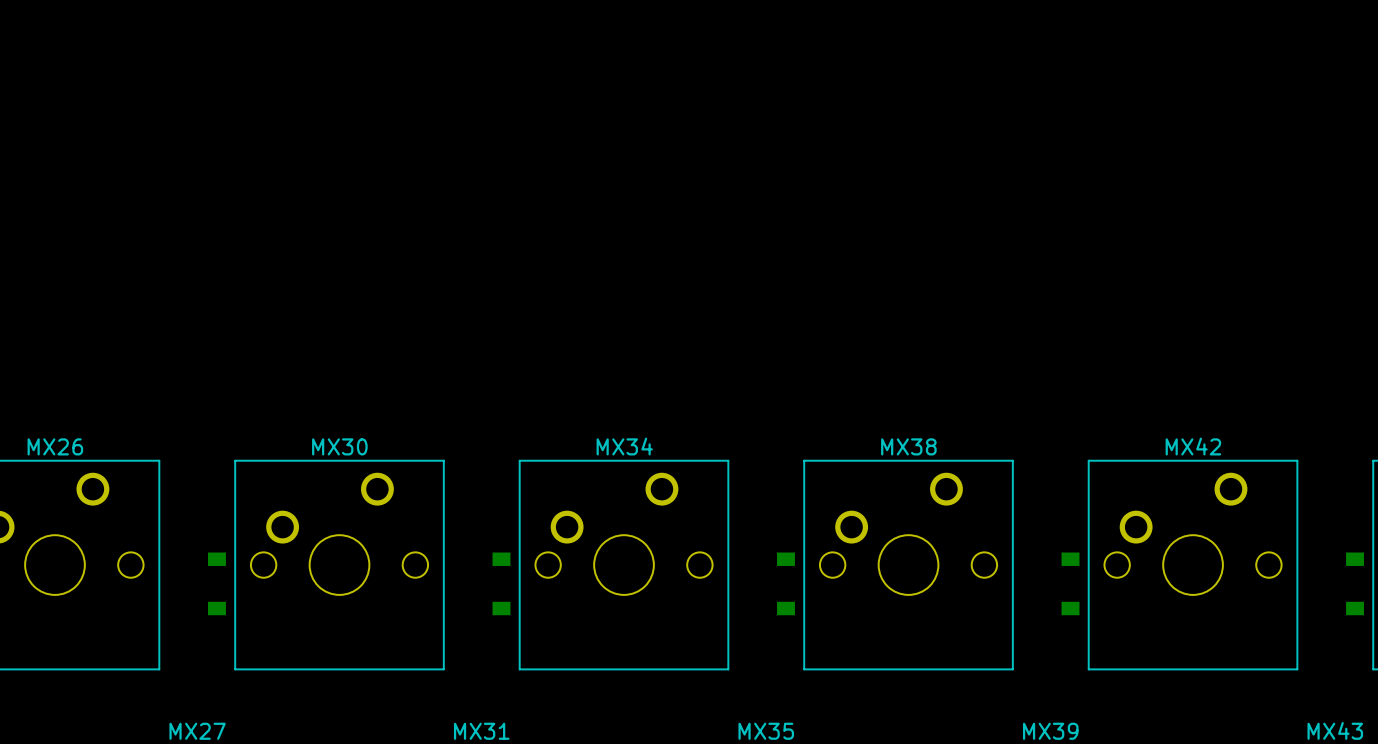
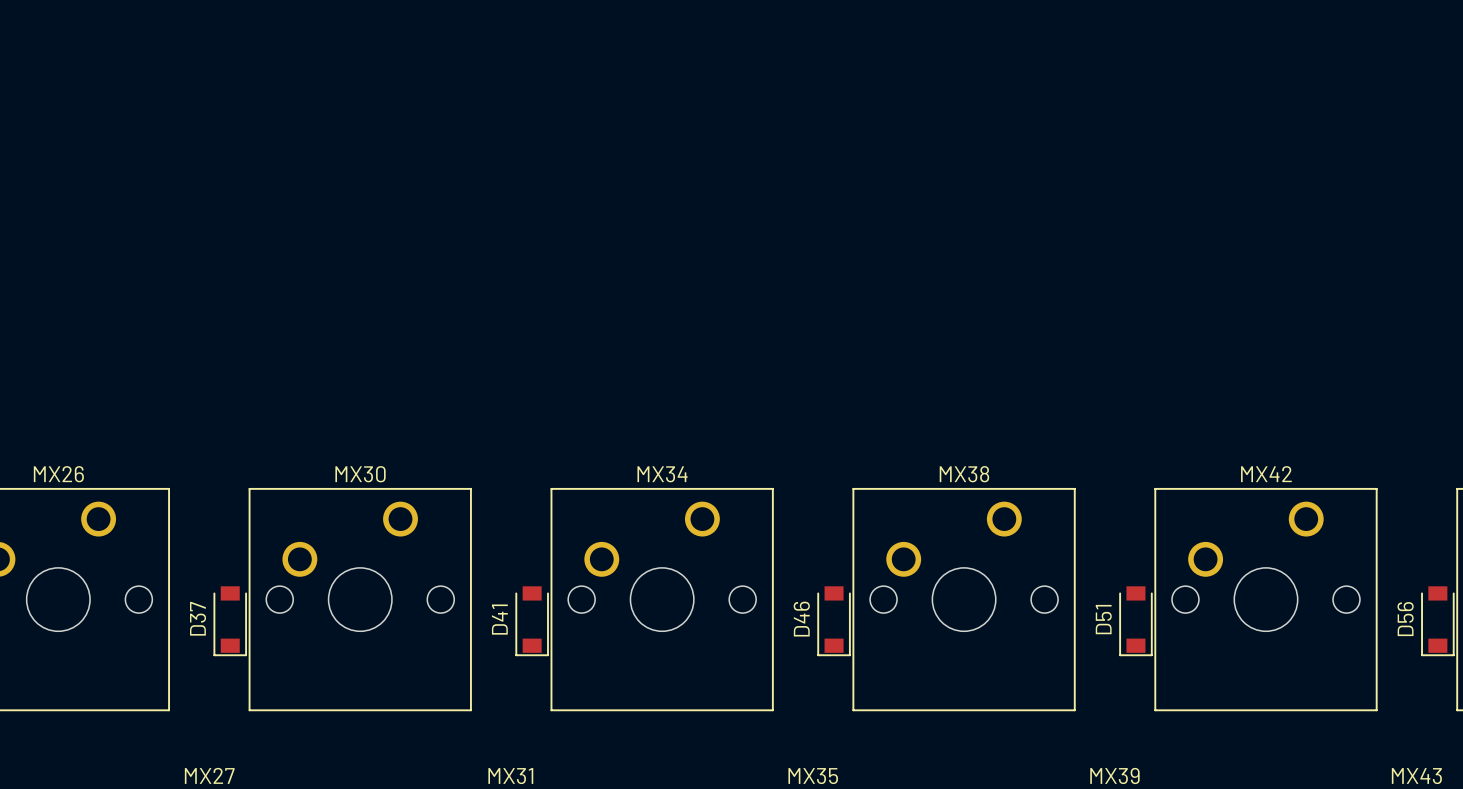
D37 side: bottom (216, 583) -> top (230, 621)
D41 side: bottom (501, 583) -> top (532, 621)
D46 side: bottom (785, 583) -> top (834, 621)
D51 side: bottom (1070, 583) -> top (1135, 621)
D56 side: bottom (1355, 583) -> top (1437, 621)

